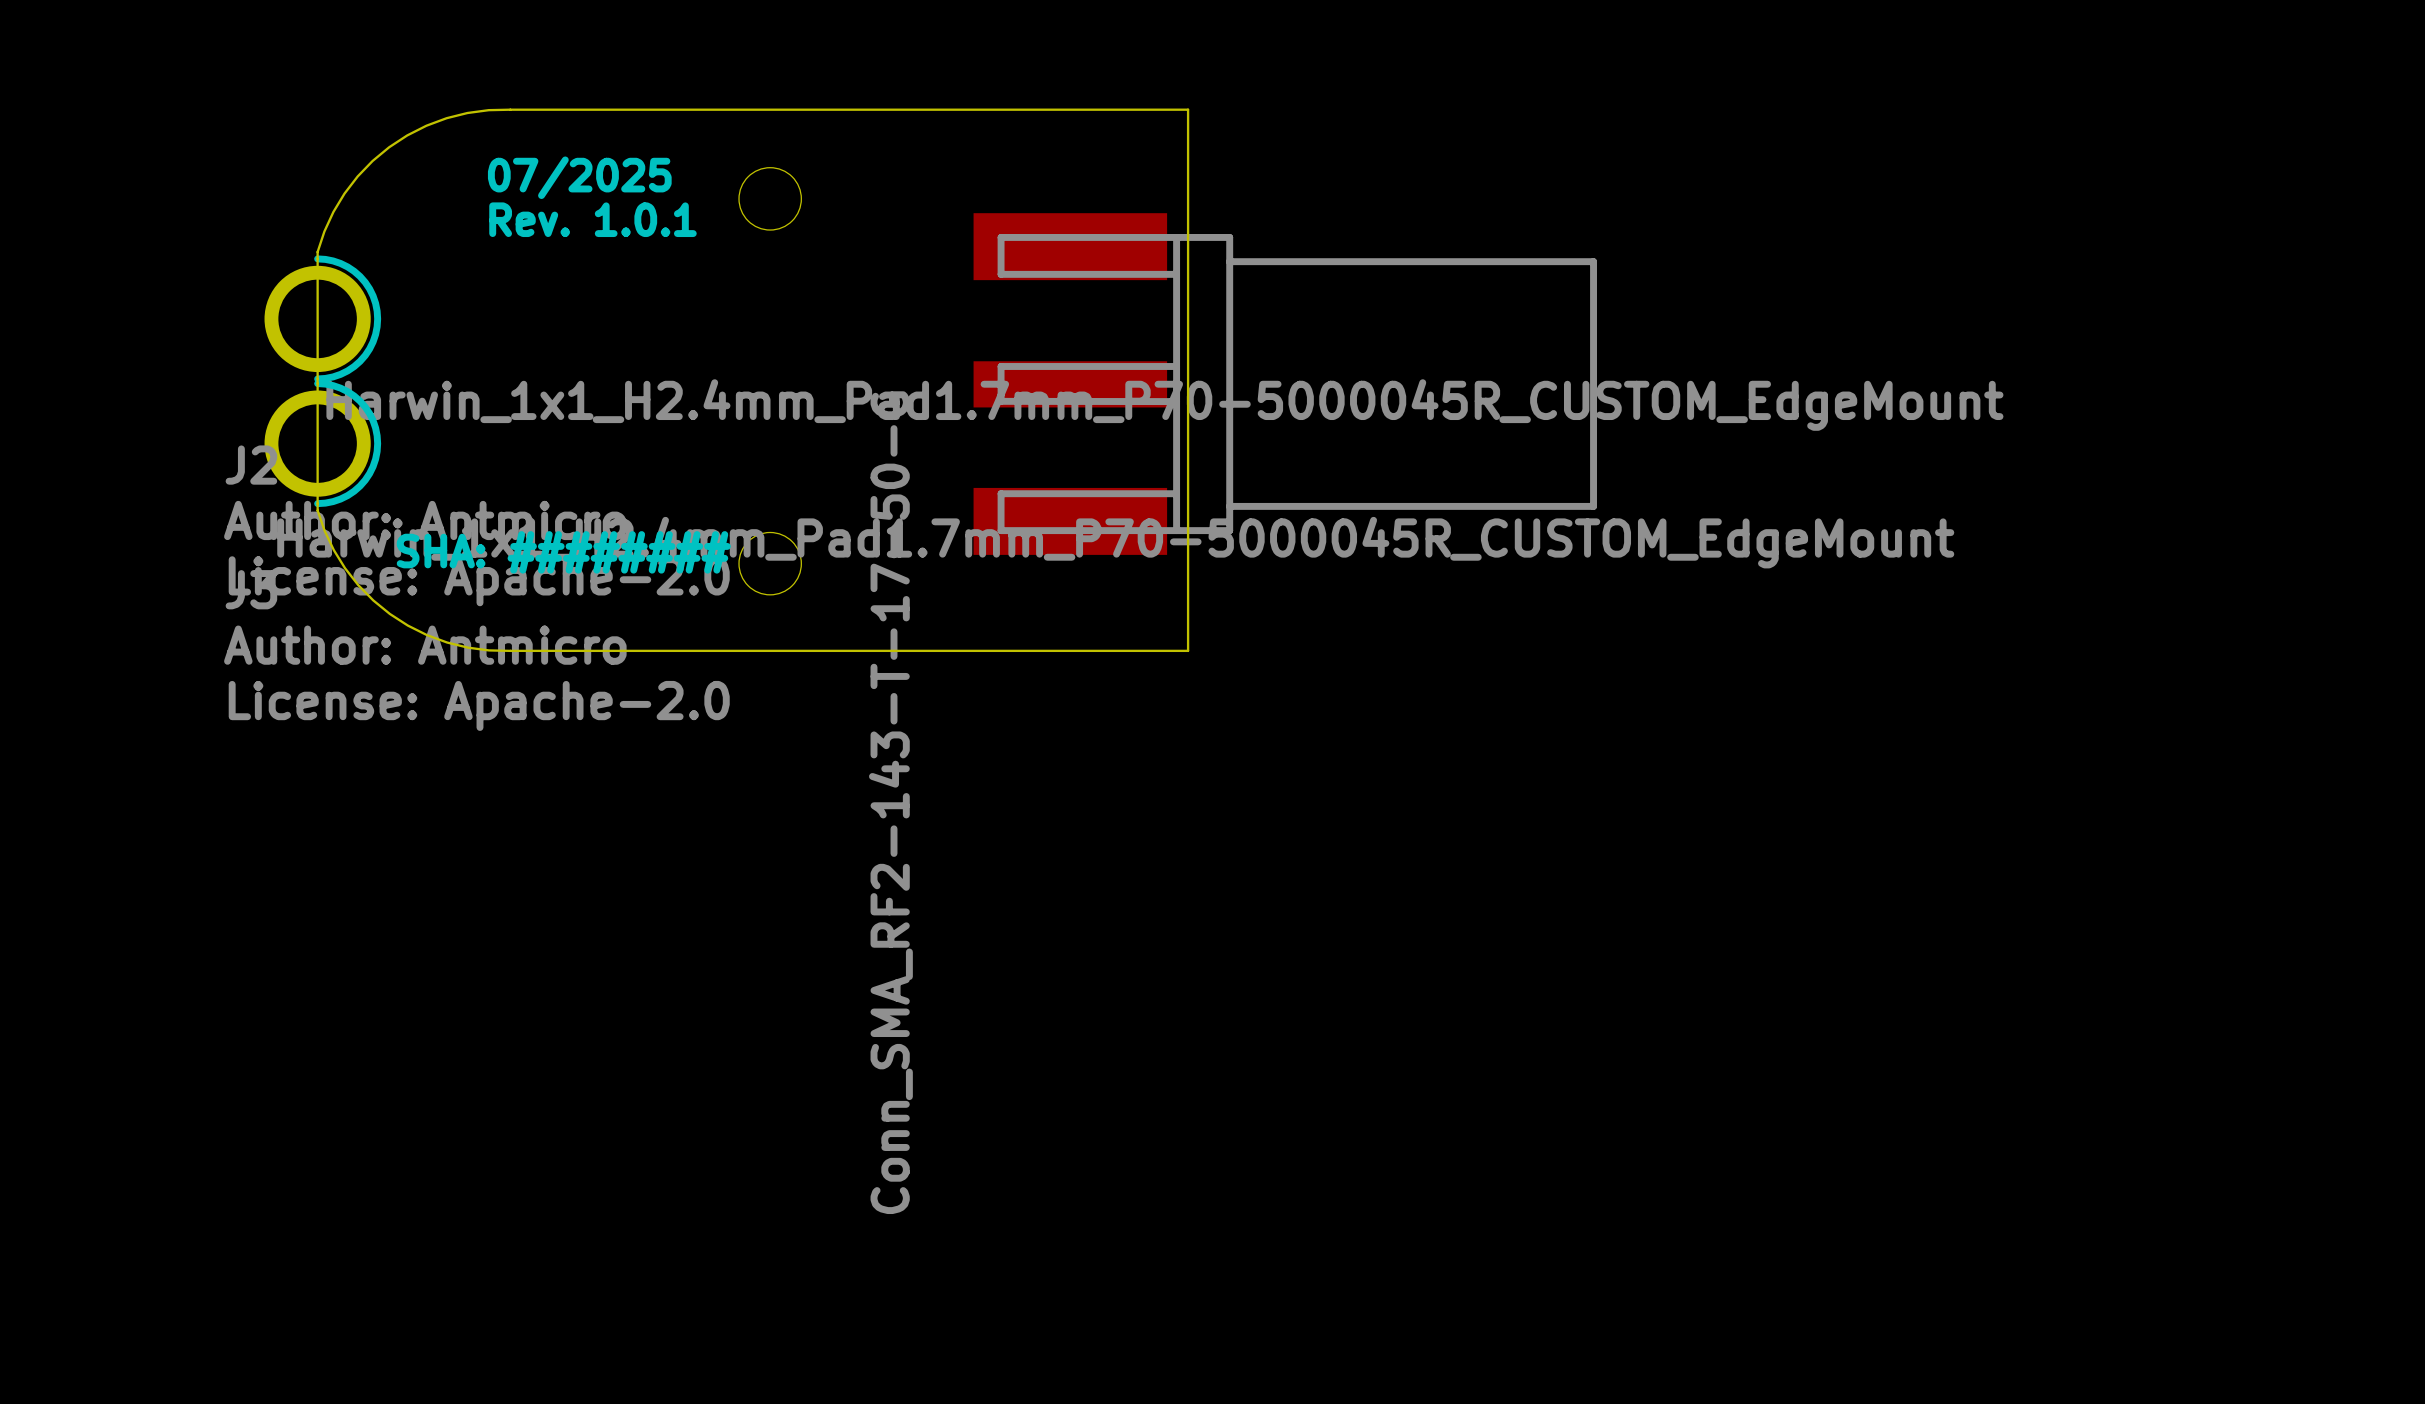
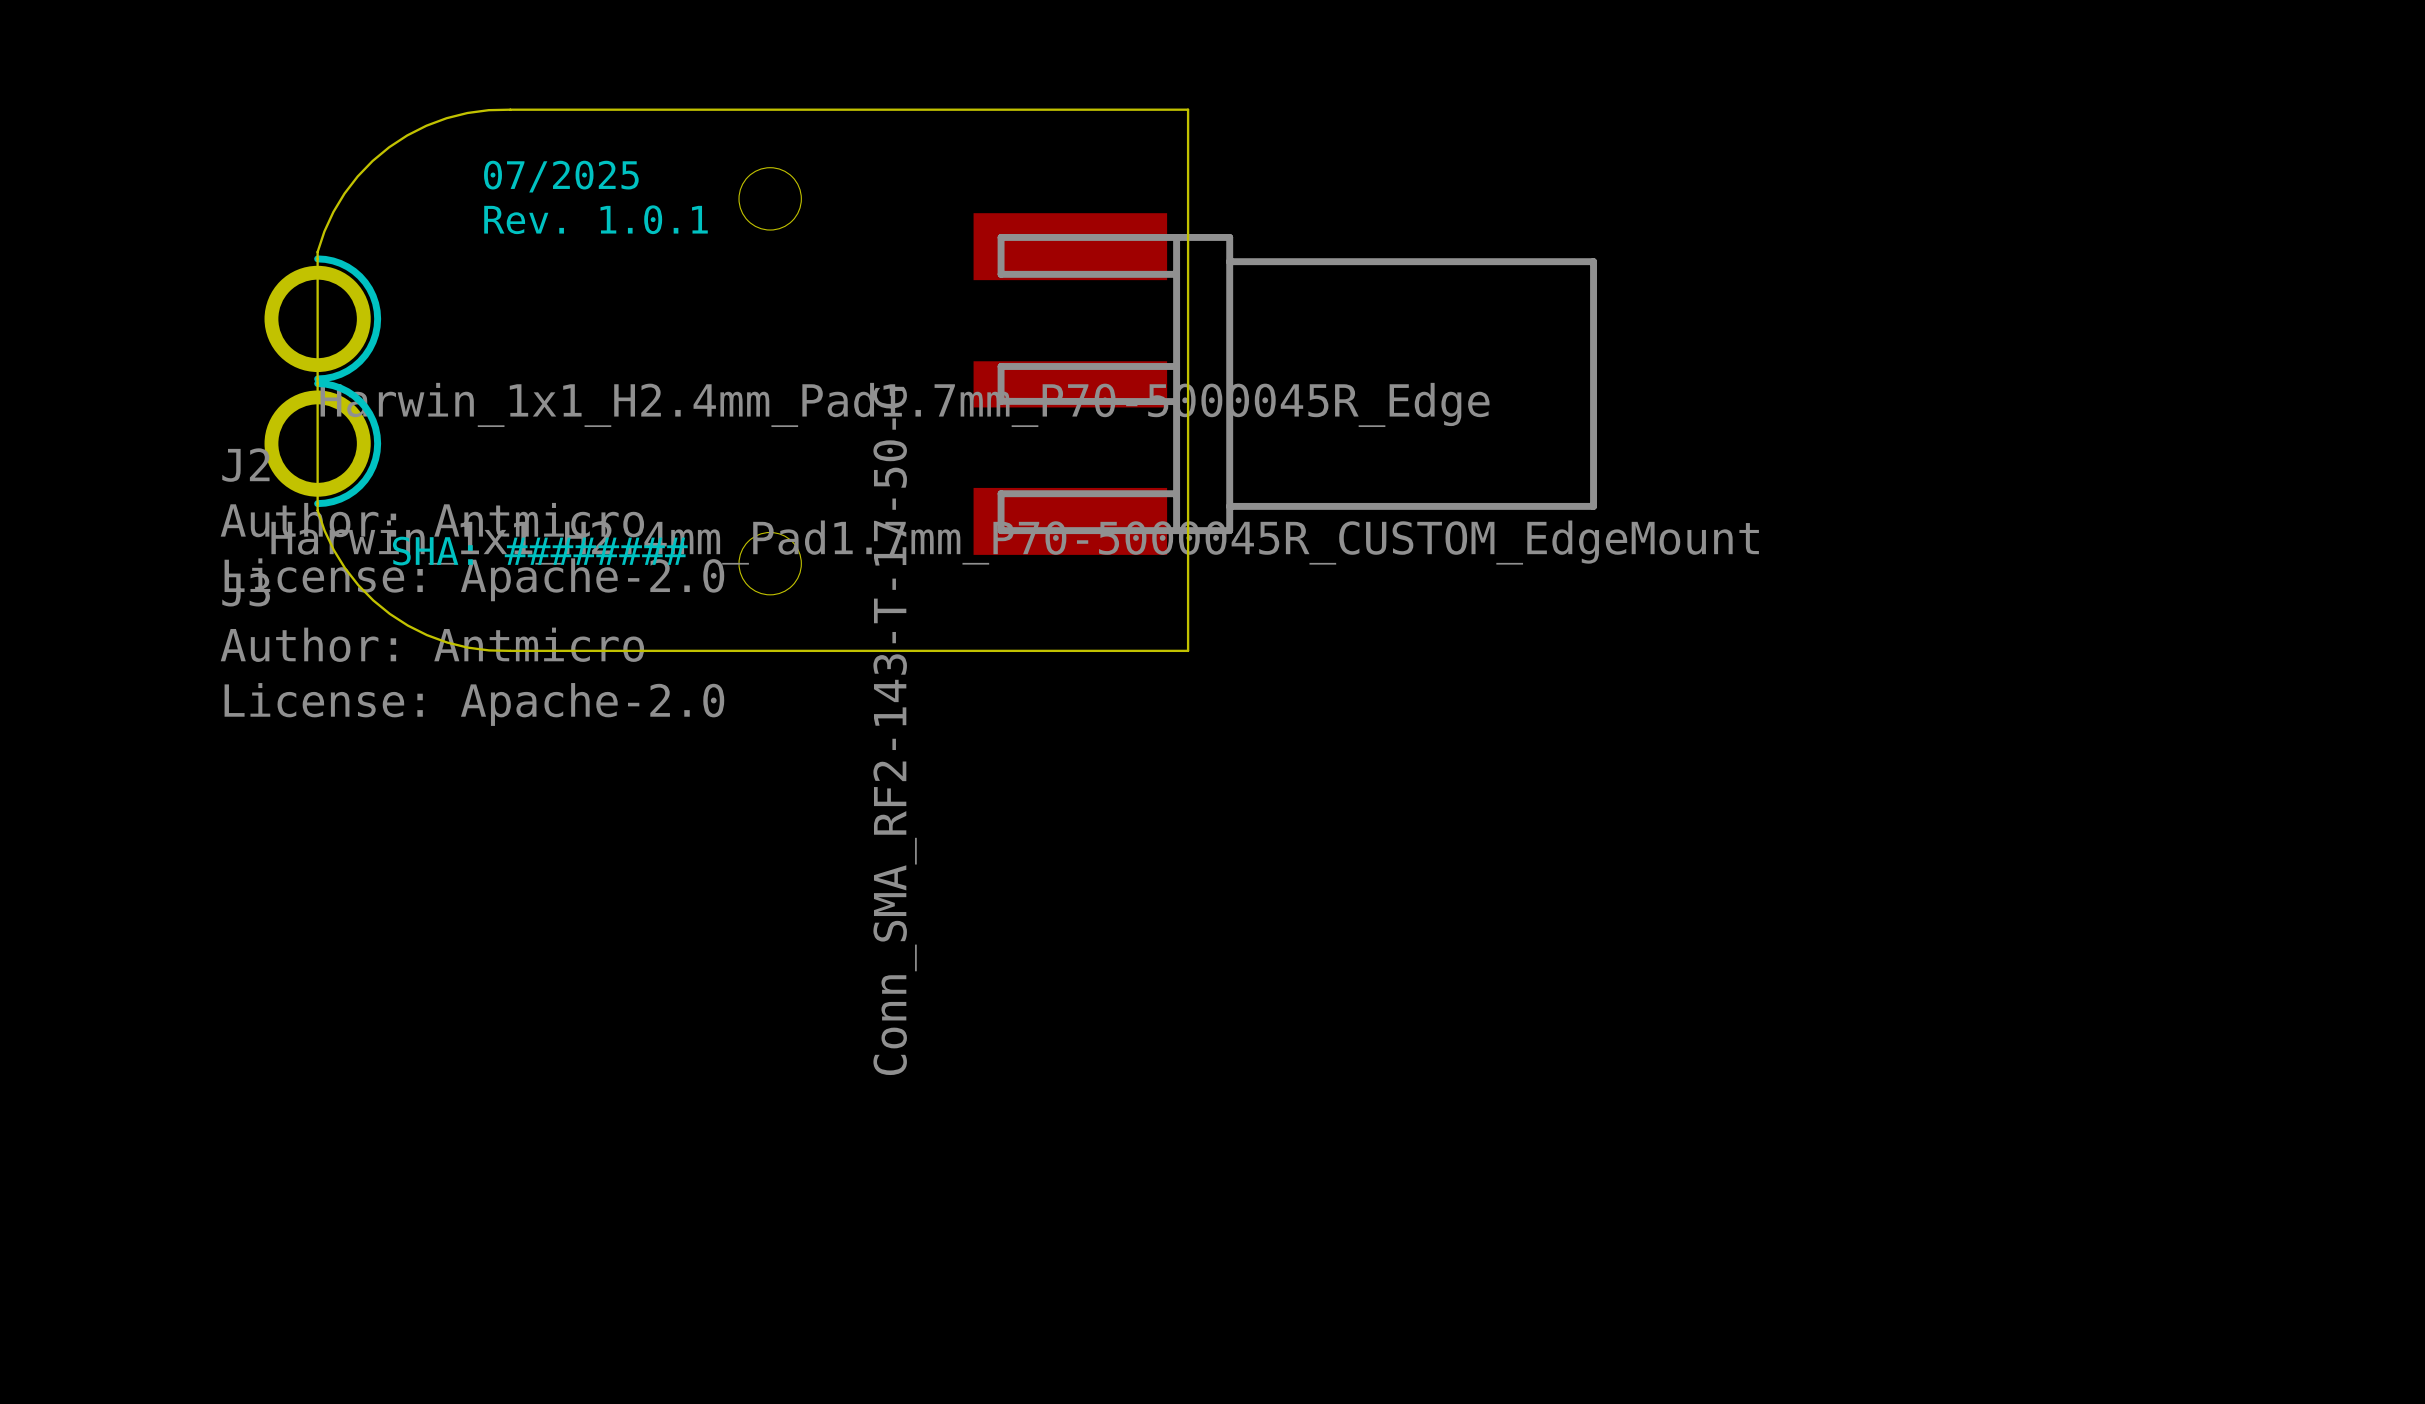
J2 value: Harwin_1x1_H2.4mm_Pad1.7mm_P70-5000045R_CUSTOM_EdgeMount (1164, 405) -> Harwin_1x1_H2.4mm_Pad1.7mm_P70-5000045R_Edge (905, 404)

